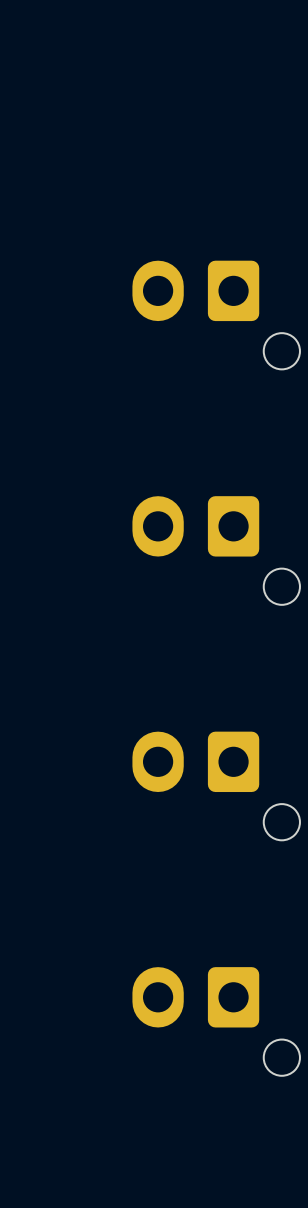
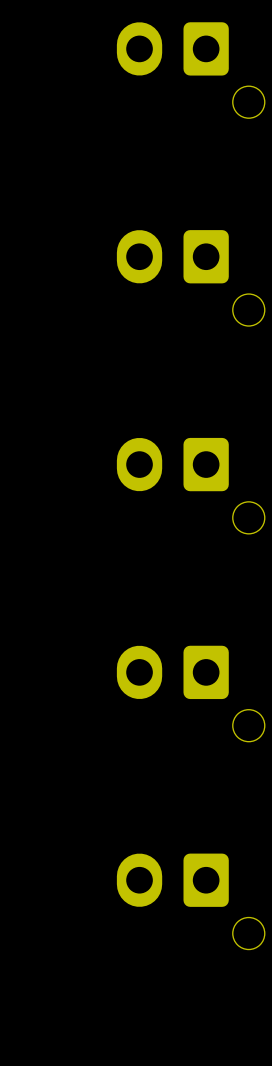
part: none -> (190, 70)

